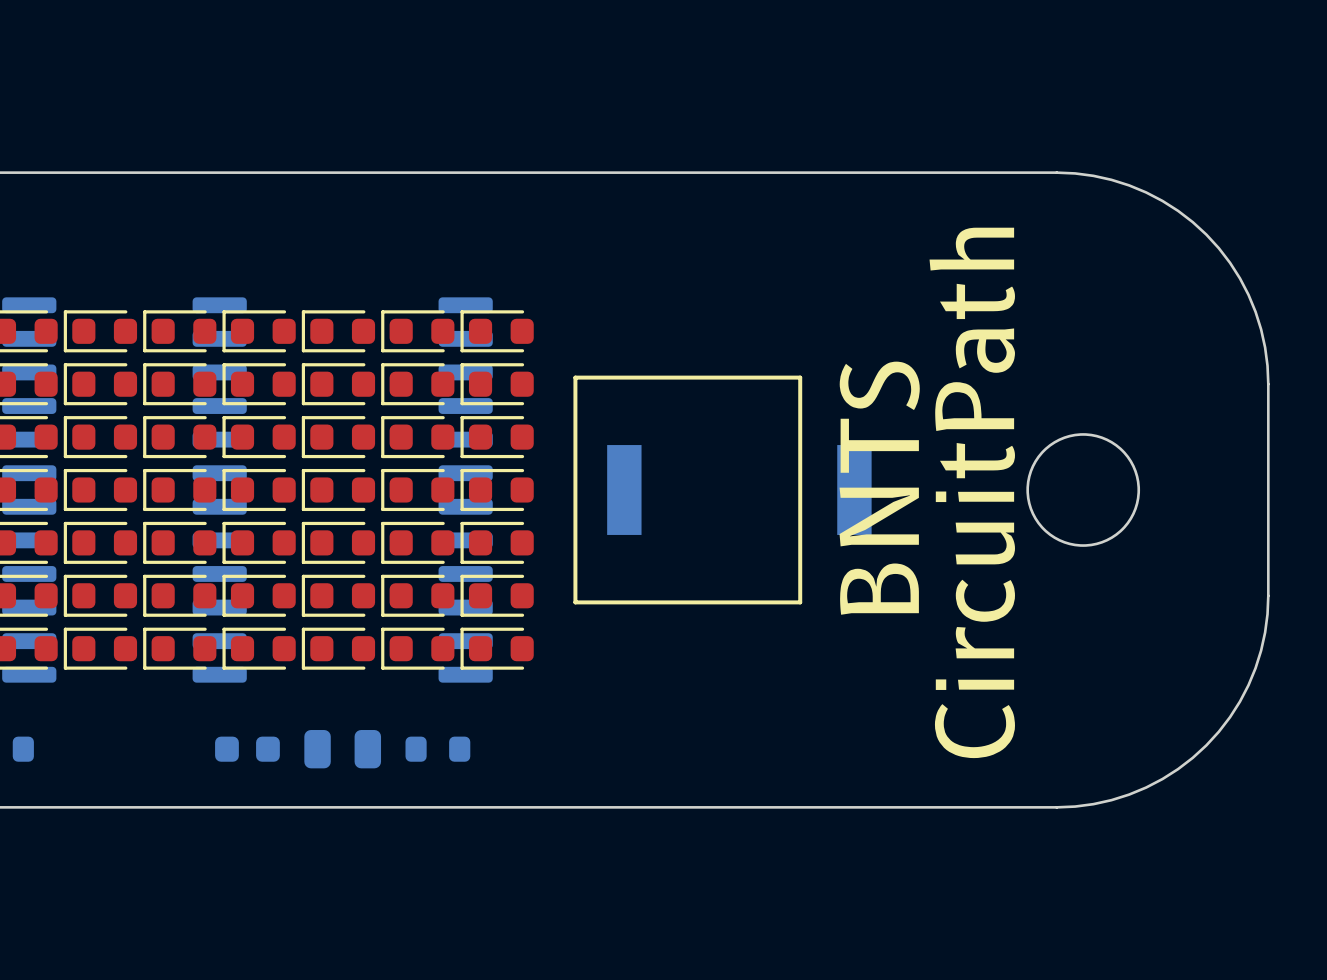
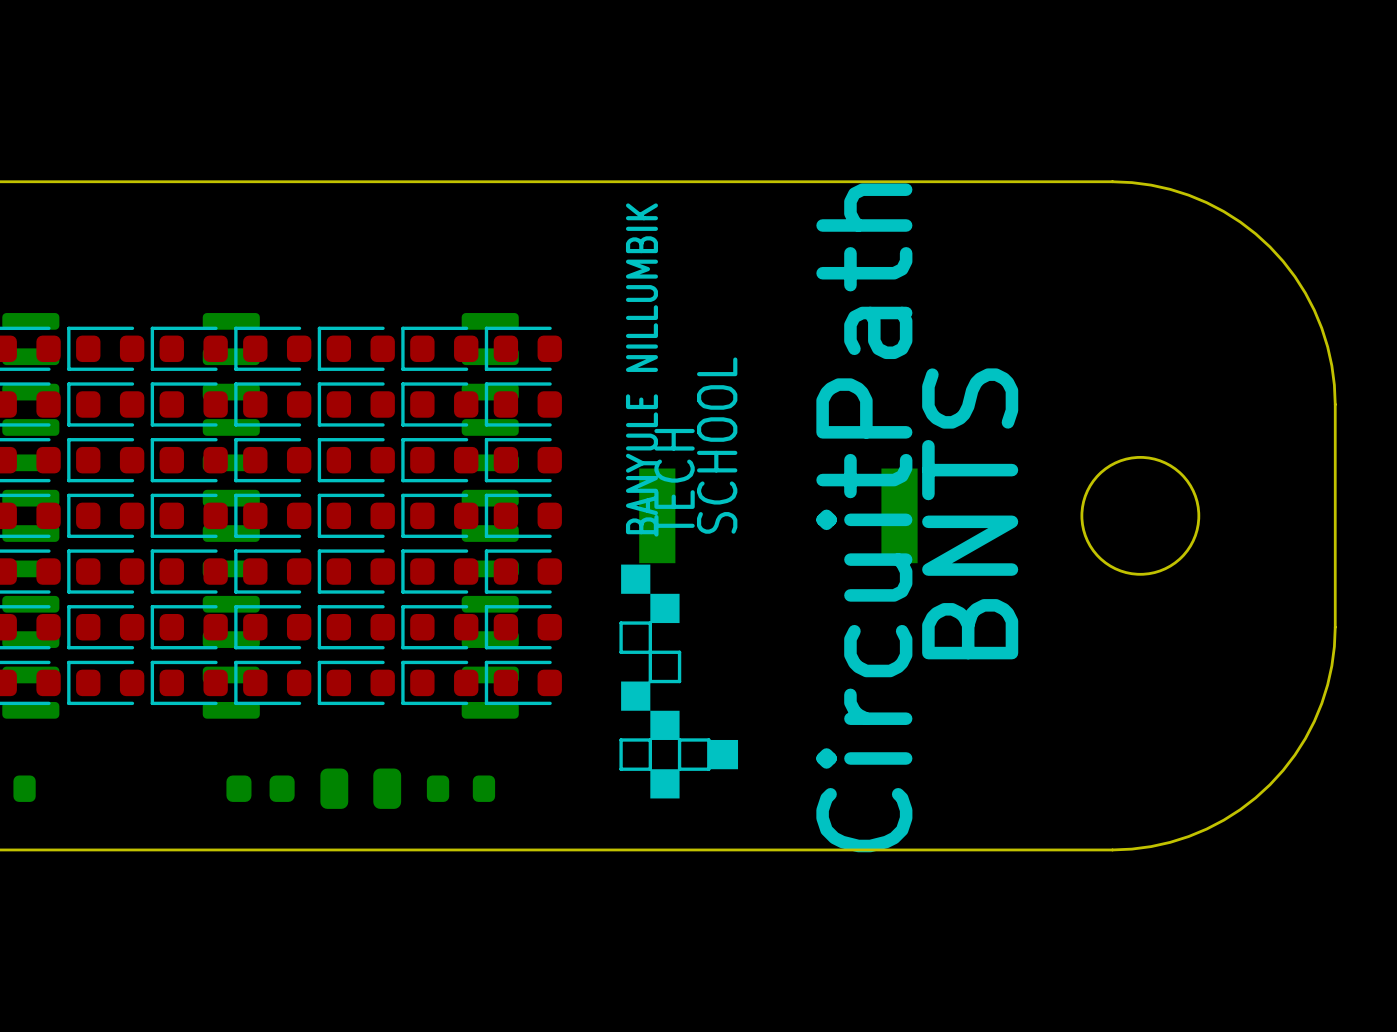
text: none -> BANYULE NILLUMBIK (641, 368)
line: (575, 377) (800, 377) (800, 602) (575, 602) (575, 377) -> none
text: none -> SCHOOL (717, 445)
text: none -> TECH (674, 482)
text position: BNTS (879, 488) -> BNTS (970, 513)
text position: CircuitPath (972, 492) -> CircuitPath (864, 517)
drawing: none -> [621, 564, 680, 624]
line: none -> (621, 623) (650, 623) (650, 681) (679, 681) (679, 652) (621, 652) (621, 623)
drawing: none -> [621, 681, 739, 799]
line: none -> (621, 739) (621, 769) (650, 769) (650, 739) (621, 739)
line: none -> (679, 739) (708, 739) (708, 769) (679, 769) (679, 739)

